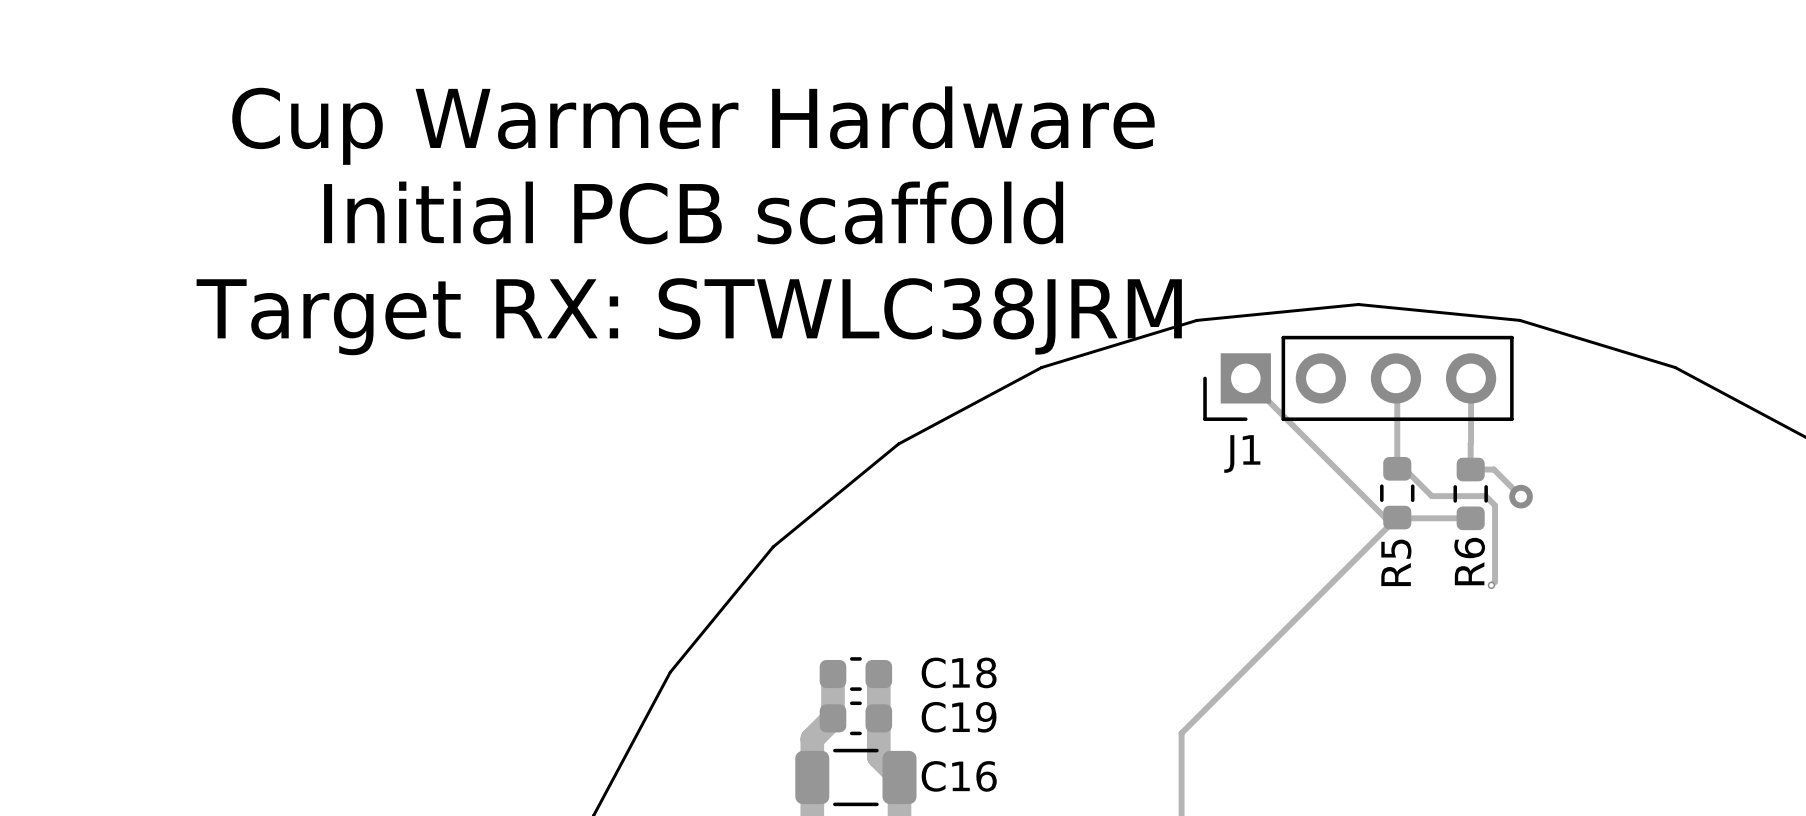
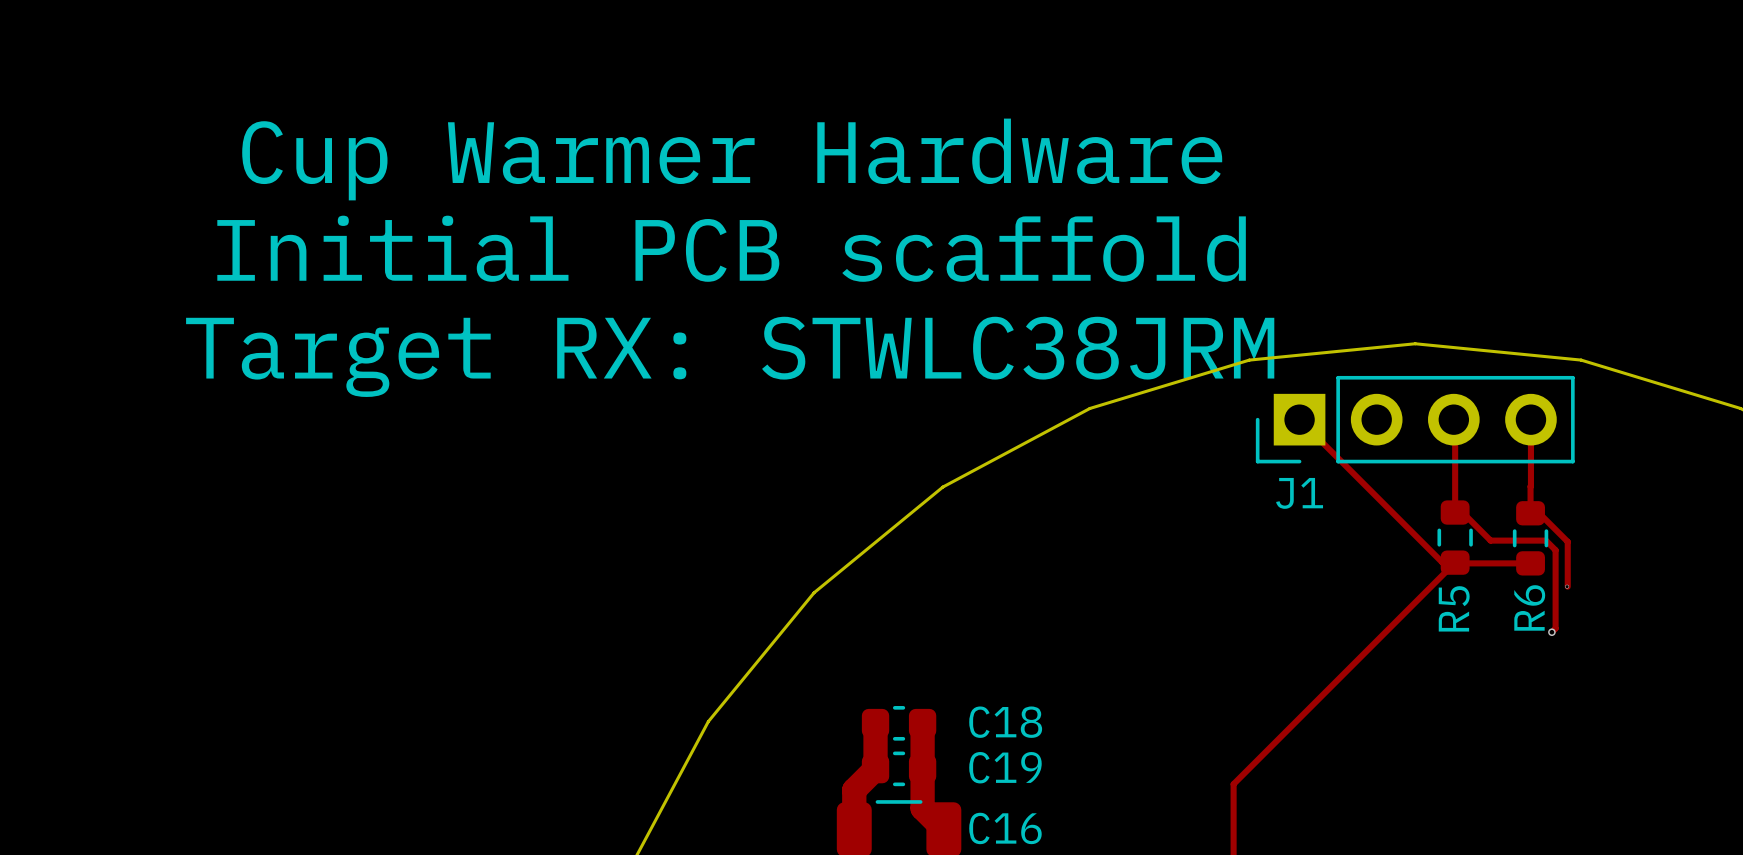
track: (1479, 469) (1493, 469) (1521, 496) -> (1539, 513) (1567, 541) (1567, 586)
via: (1521, 496) -> none
via: none -> (1567, 586)

